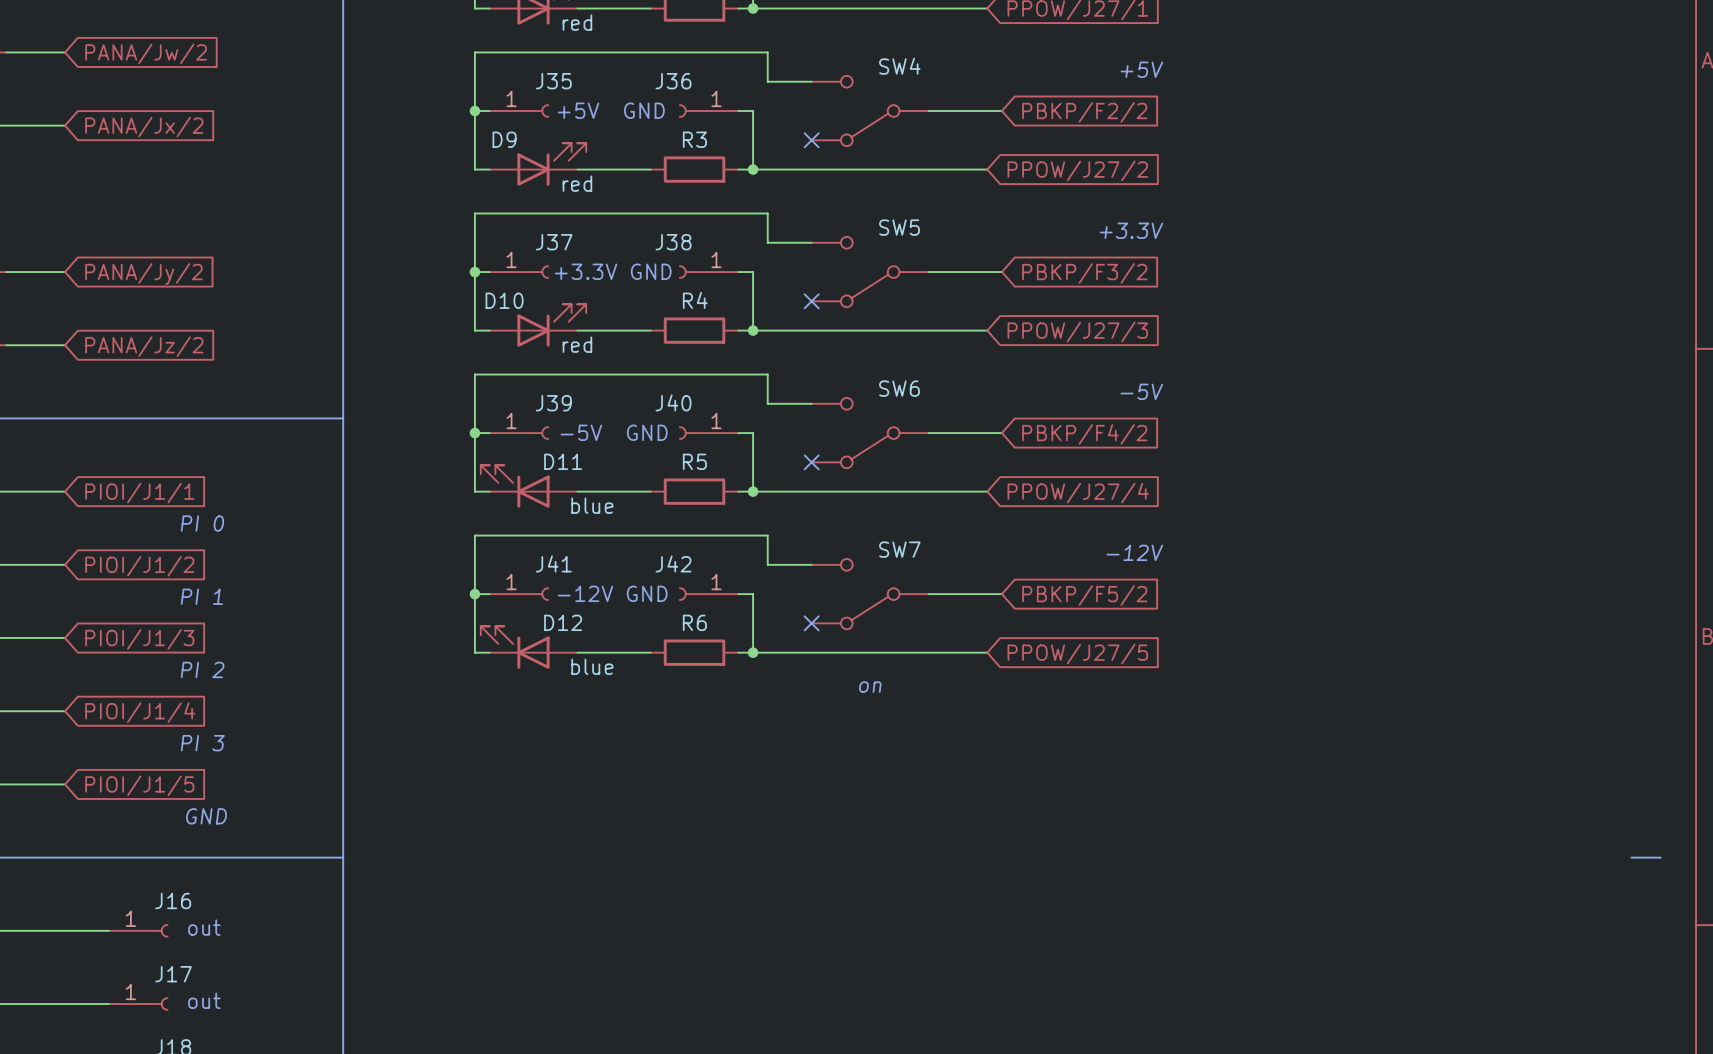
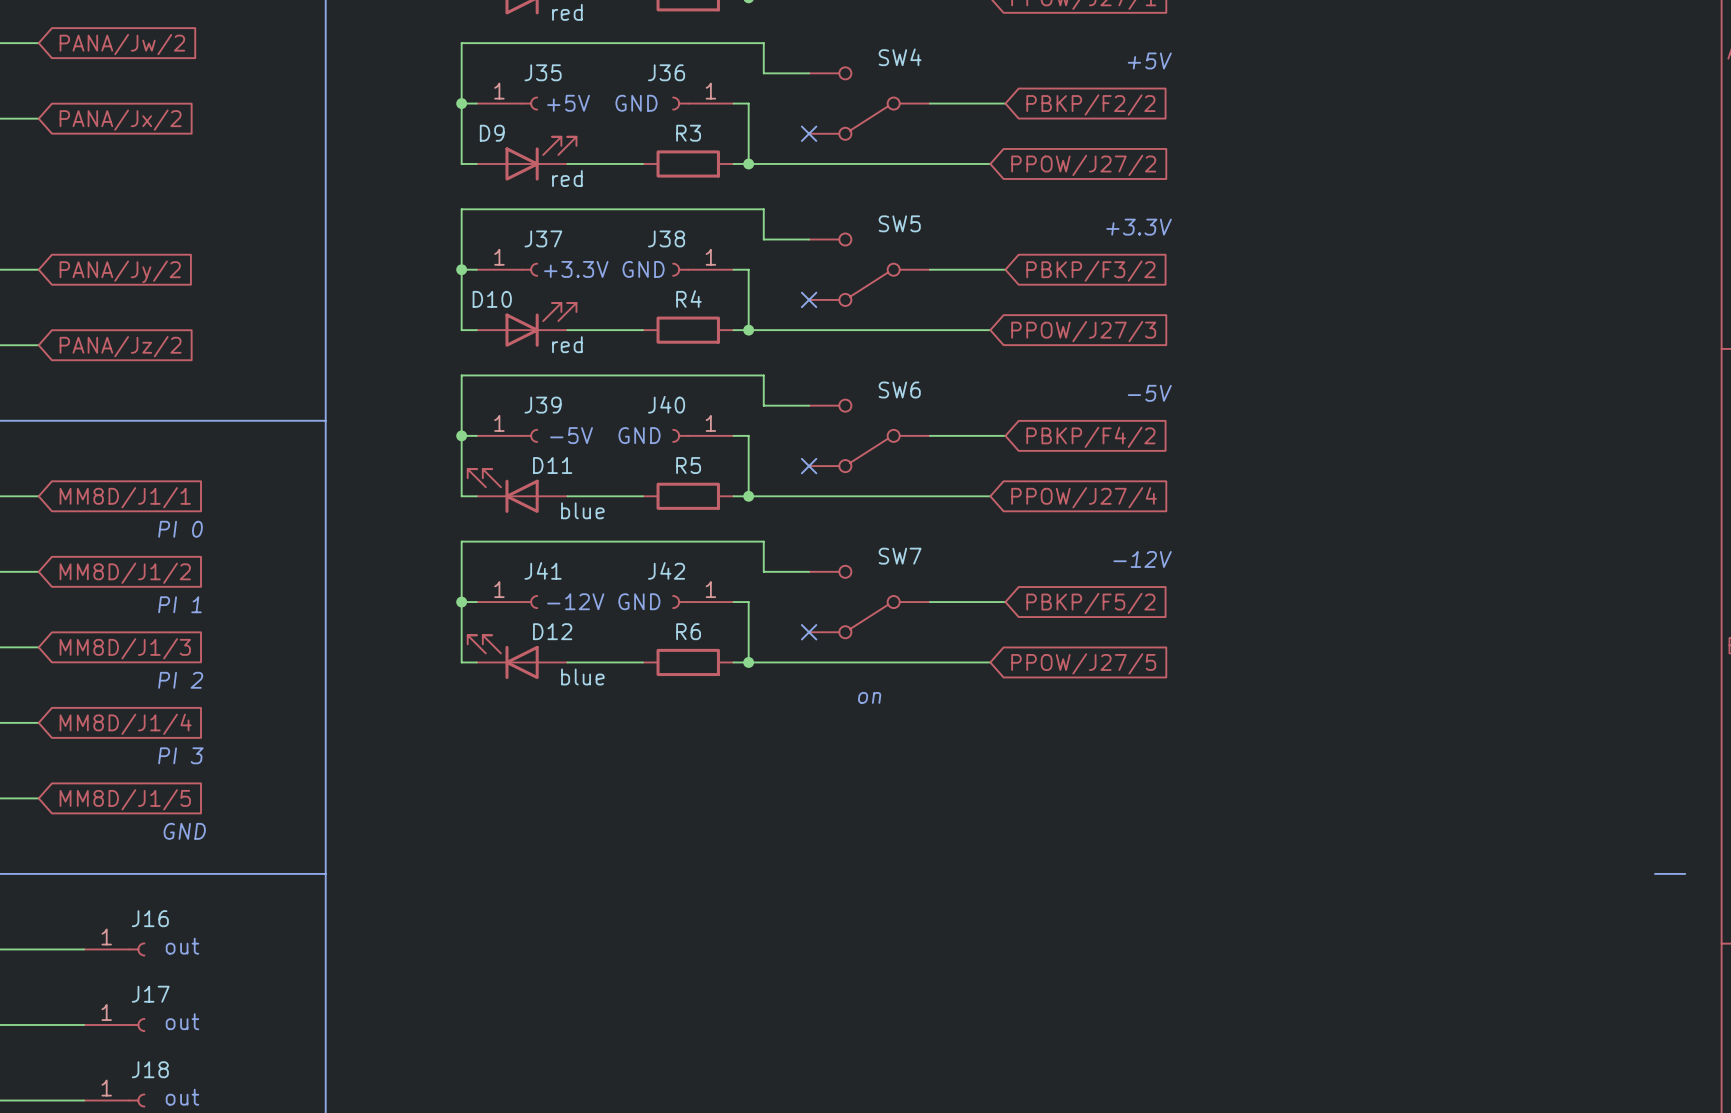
global label: PIOI/J1/1 (139, 493) -> MM8D/J1/1 (125, 497)
global label: PIOI/J1/2 (139, 566) -> MM8D/J1/2 (125, 573)
global label: PIOI/J1/3 (139, 639) -> MM8D/J1/3 (125, 648)
global label: PIOI/J1/4 (140, 712) -> MM8D/J1/4 (125, 724)
global label: PIOI/J1/5 (139, 785) -> MM8D/J1/5 (125, 799)

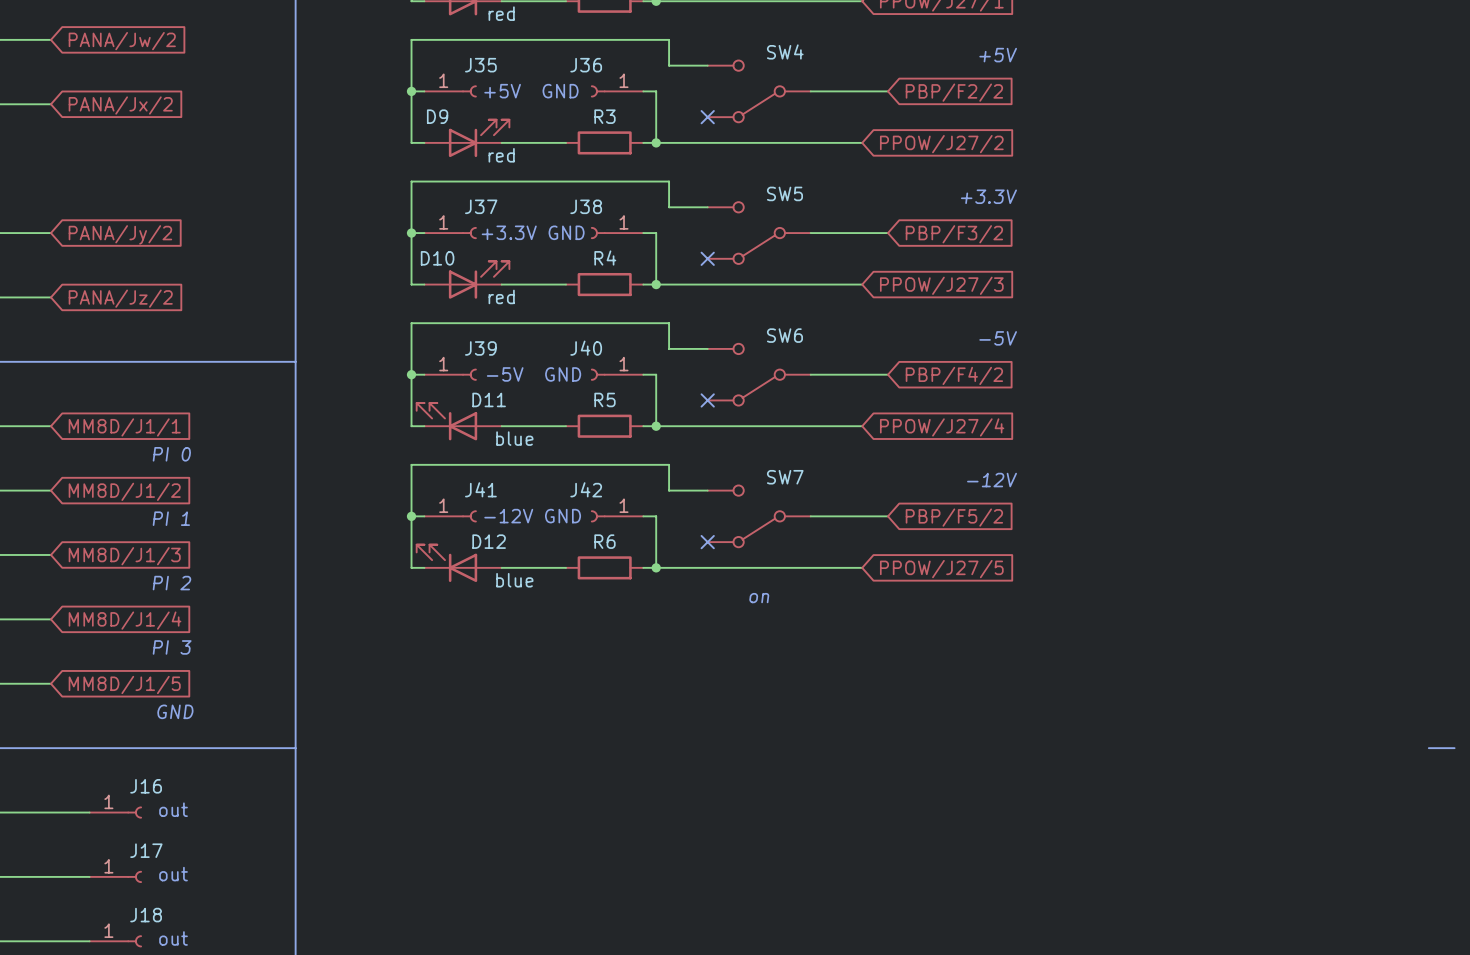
wire: none -> (875, 91) (887, 91)
global label: PBKP/F2/2 (1090, 104) -> PBP/F2/2 (954, 92)
wire: none -> (875, 233) (887, 233)
global label: PBKP/F3/2 (1090, 271) -> PBP/F3/2 (954, 234)
wire: none -> (875, 374) (887, 374)
global label: PBKP/F4/2 (1090, 437) -> PBP/F4/2 (954, 375)
wire: none -> (875, 516) (887, 516)
global label: PBKP/F5/2 (1090, 603) -> PBP/F5/2 (954, 517)

